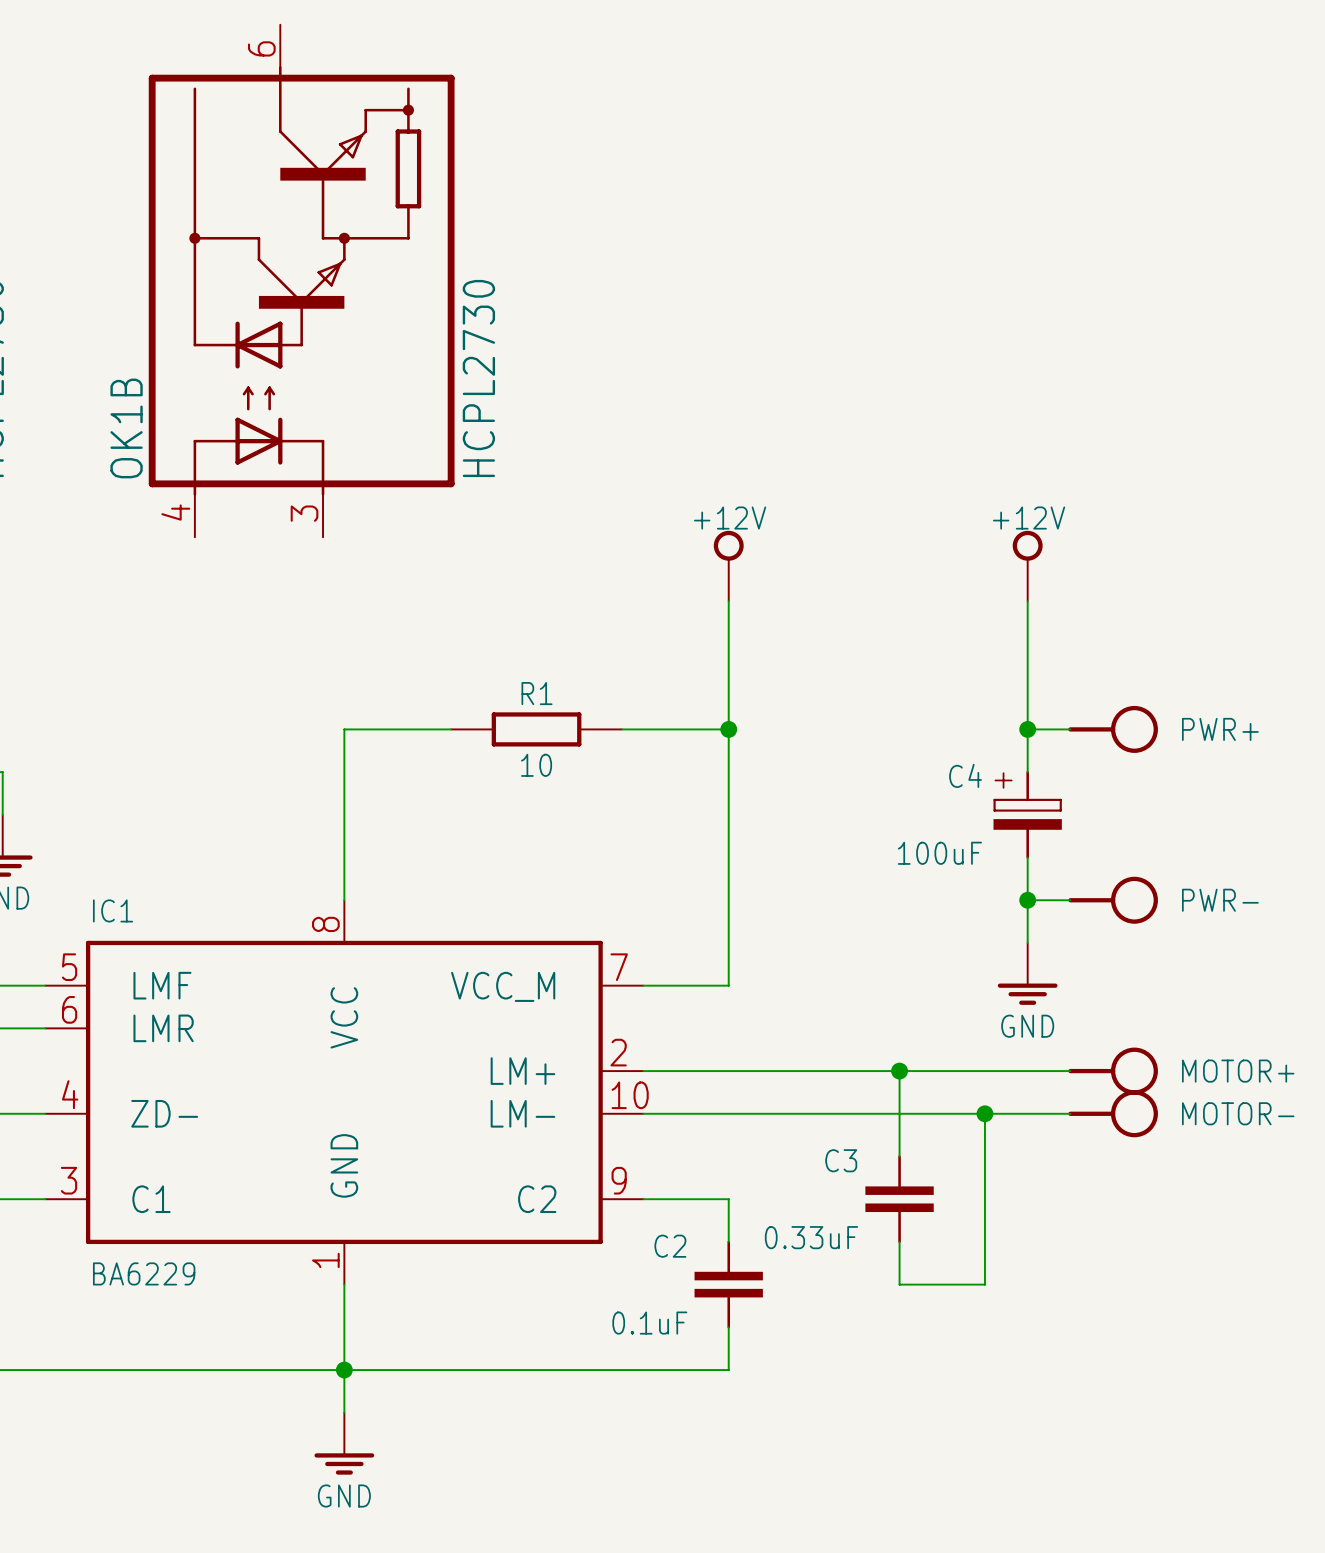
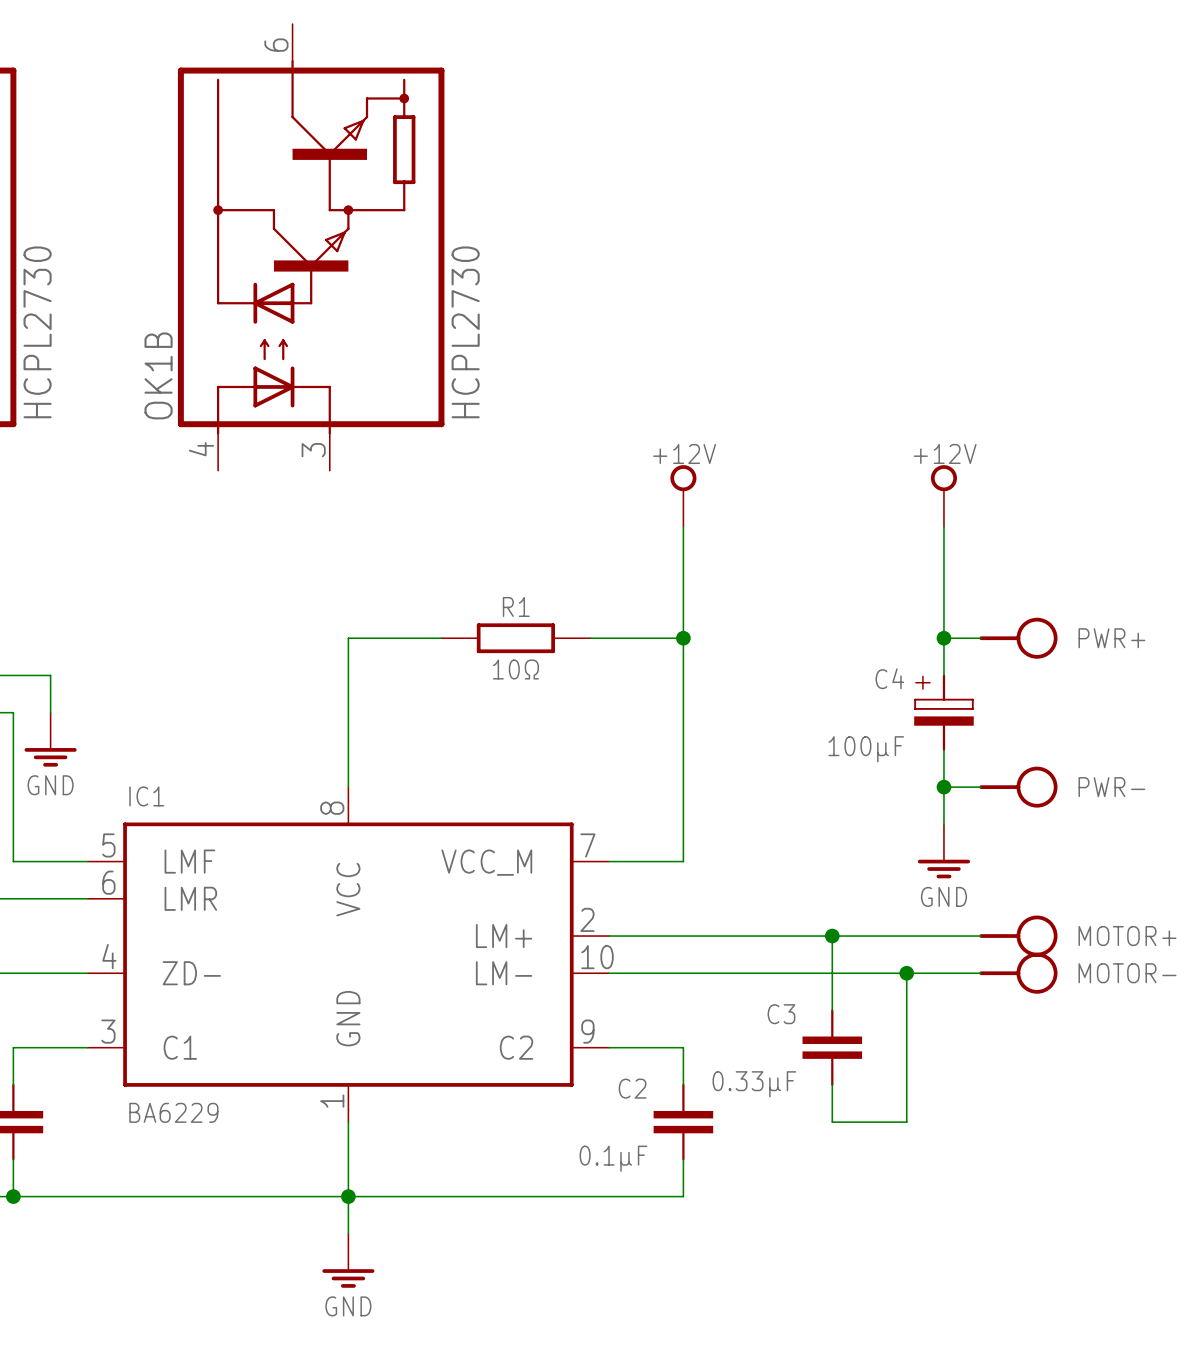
R1 value: 10 (536, 765) -> 10Ω (515, 669)
C4 value: 100uF (939, 853) -> 100μF (866, 749)
C3 value: 0.33uF (811, 1237) -> 0.33μF (754, 1084)
C2 value: 0.1uF (649, 1323) -> 0.1μF (613, 1158)

